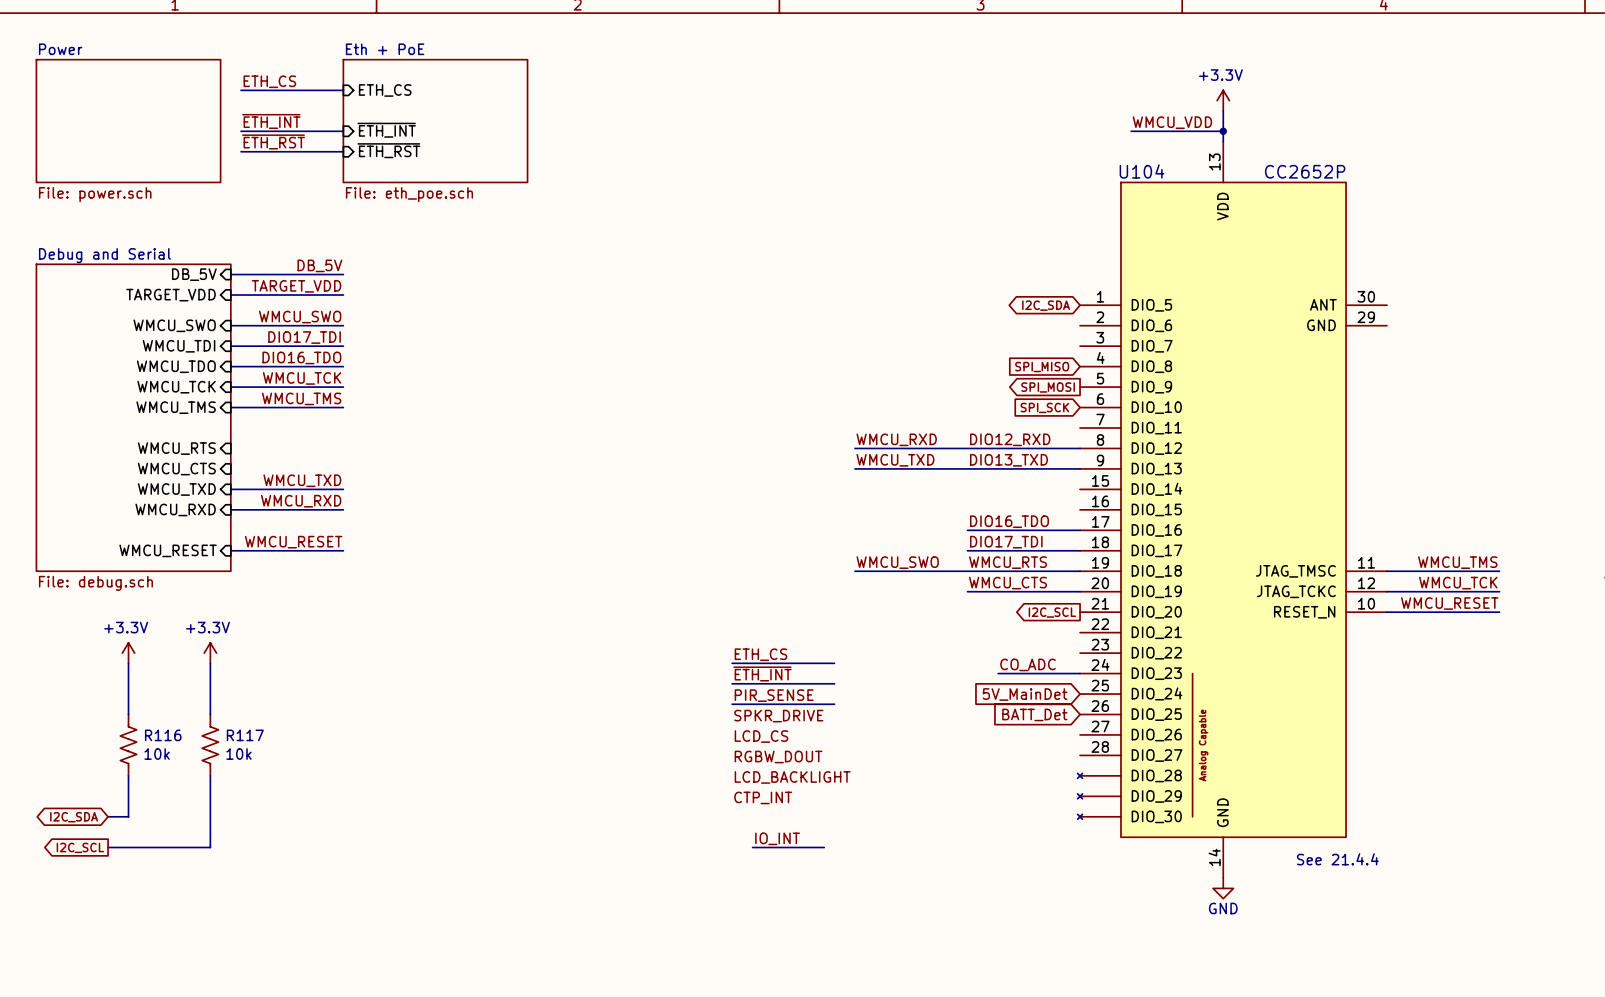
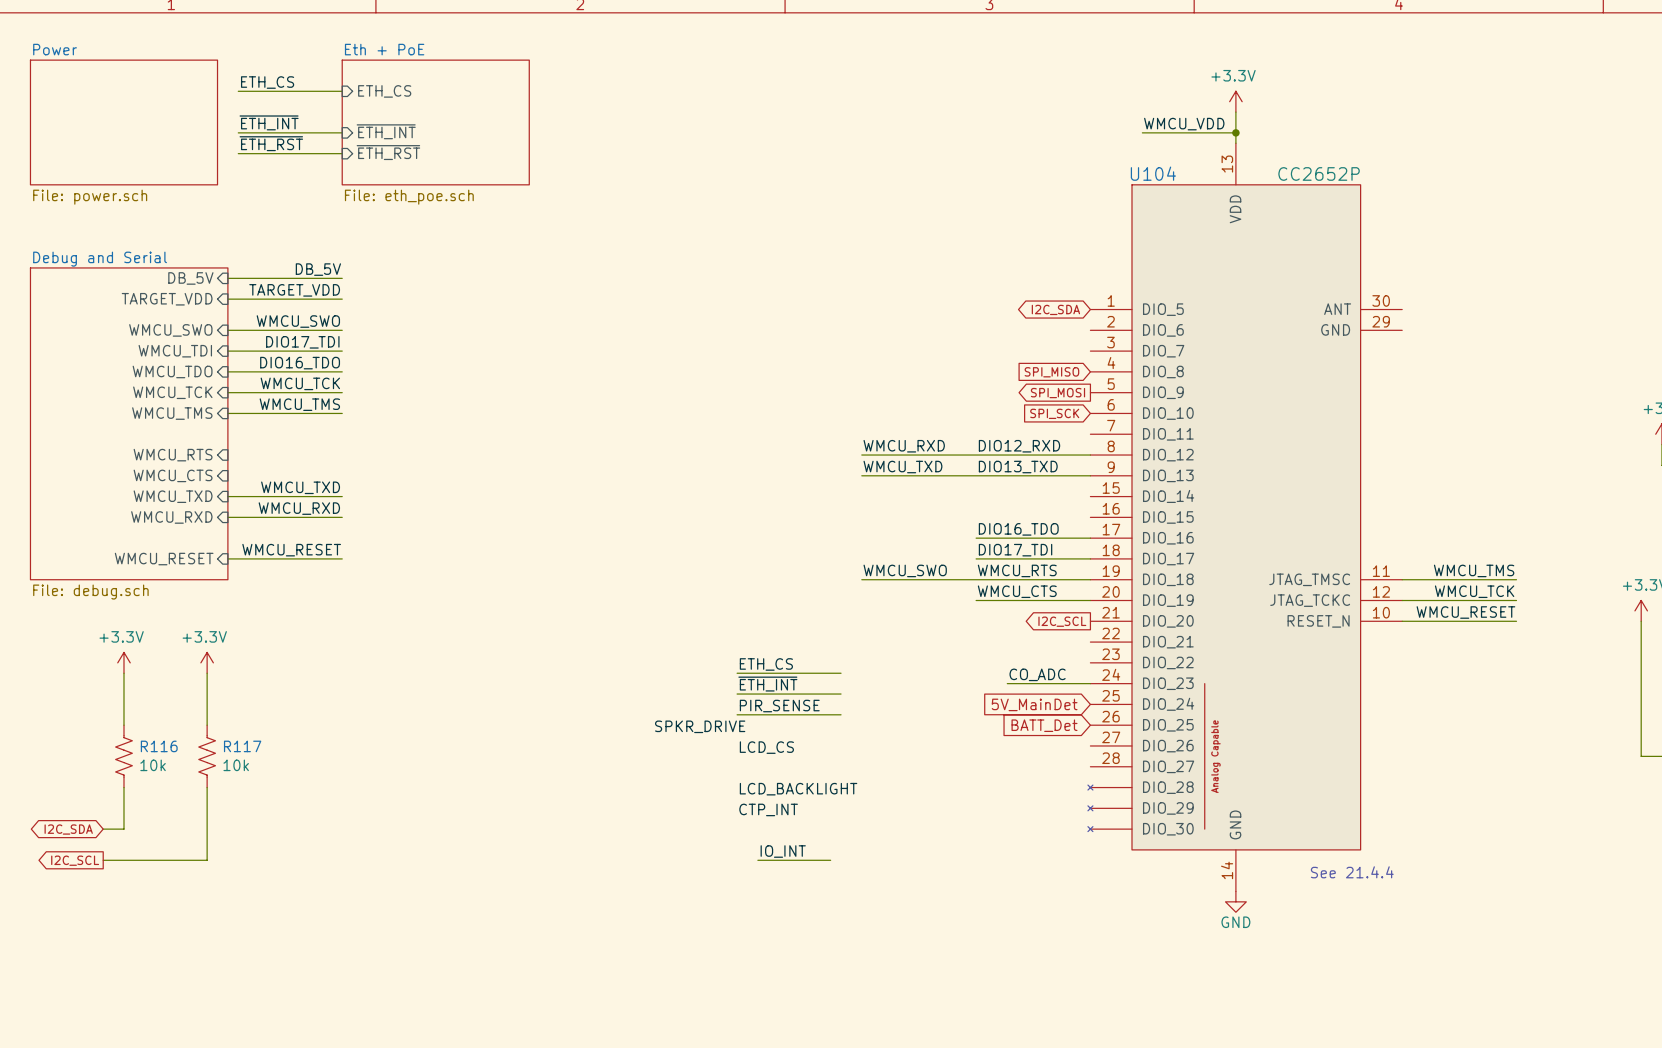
label position: SPKR_DRIVE (778, 716) -> SPKR_DRIVE (700, 726)
label: RGBW_DOUT (778, 757) -> none

